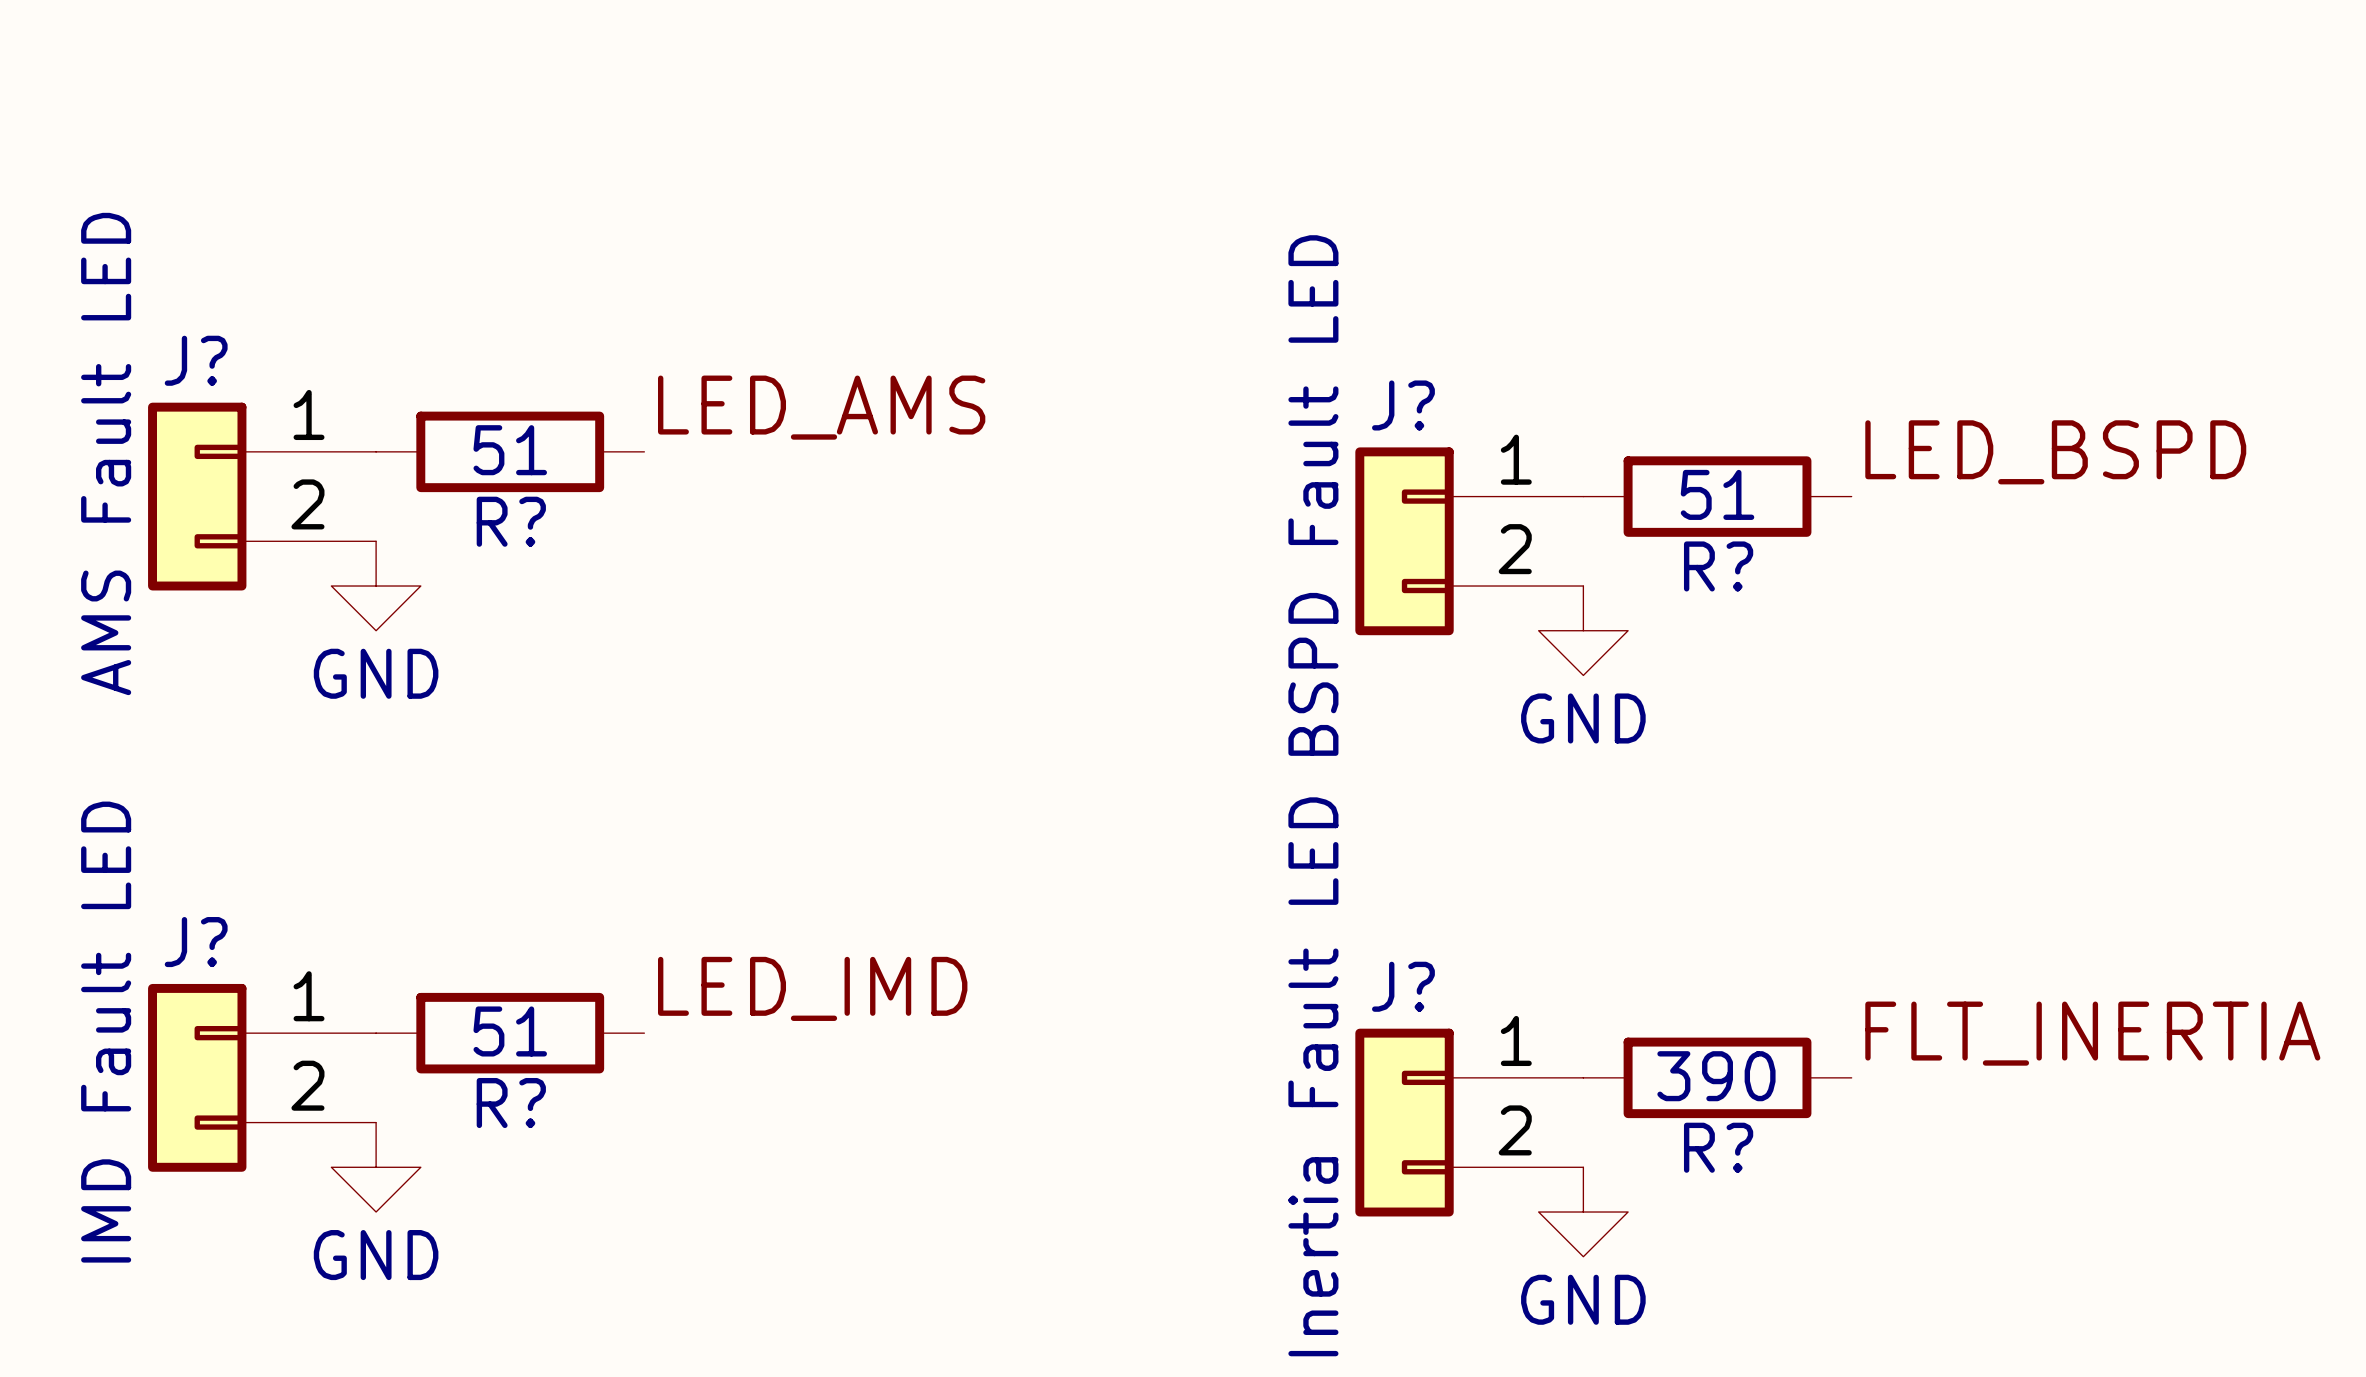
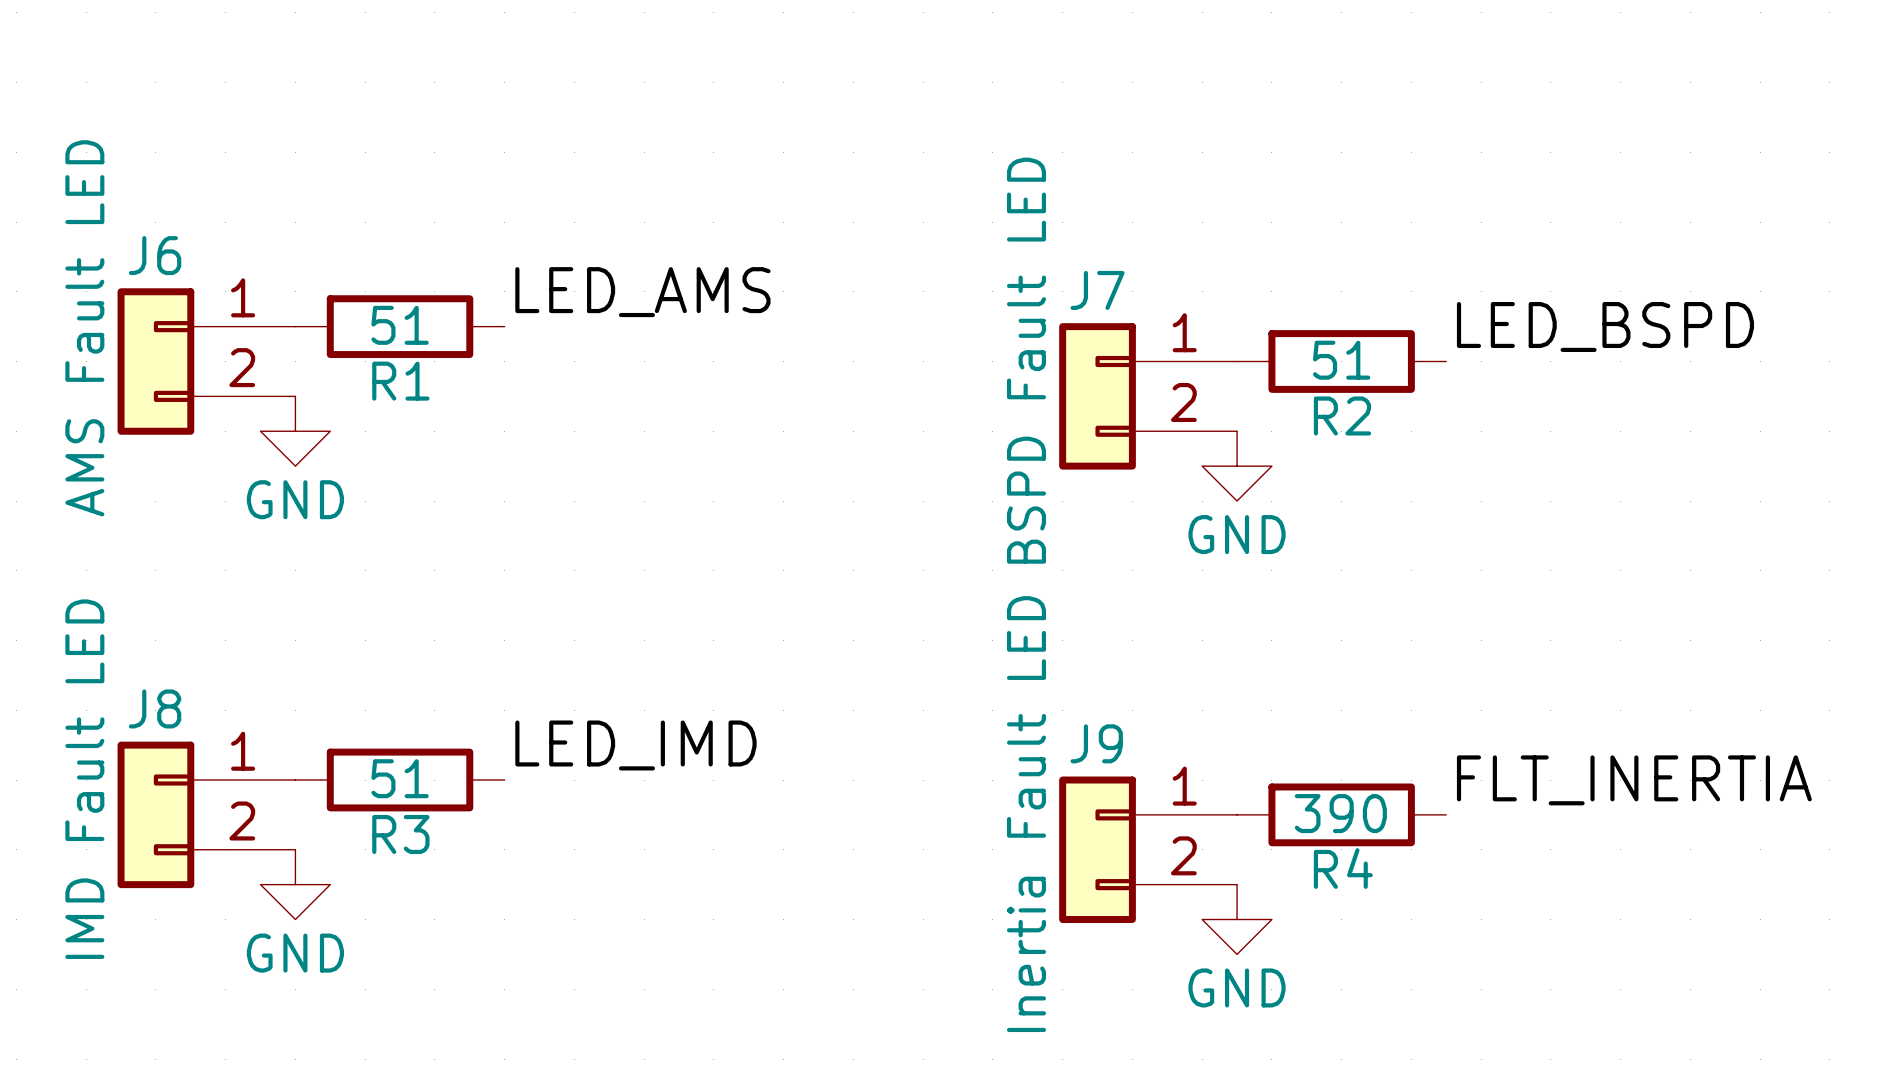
J? name: J? (196, 360) -> J6 (155, 255)
J? name: J? (1403, 405) -> J7 (1097, 290)
R? name: R? (511, 521) -> R1 (400, 381)
R? name: R? (1718, 566) -> R2 (1342, 416)
J? name: J? (196, 942) -> J8 (155, 708)
J? name: J? (1403, 986) -> J9 (1096, 743)
R? name: R? (511, 1103) -> R3 (400, 834)
R? name: R? (1718, 1147) -> R4 (1343, 868)

